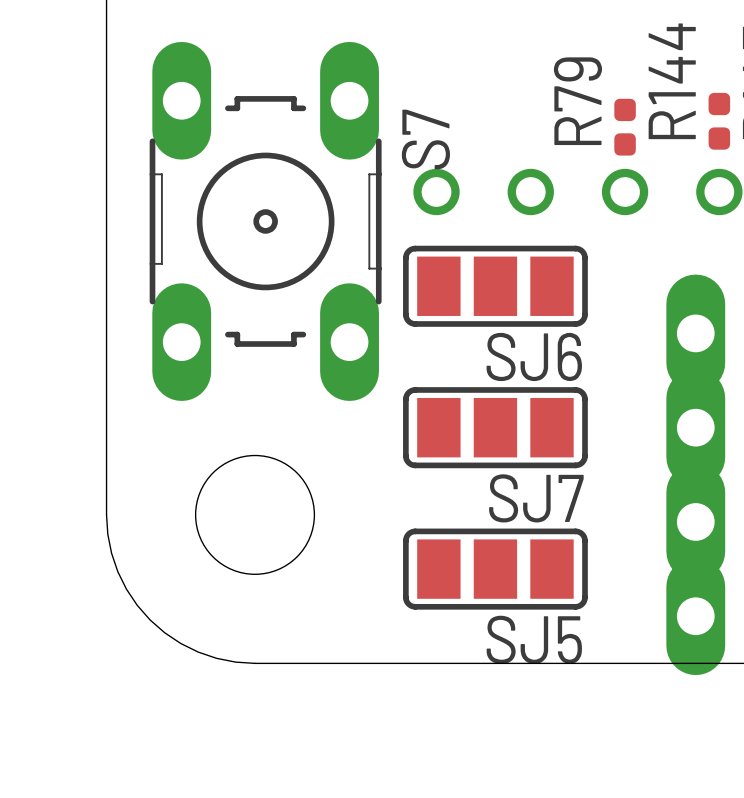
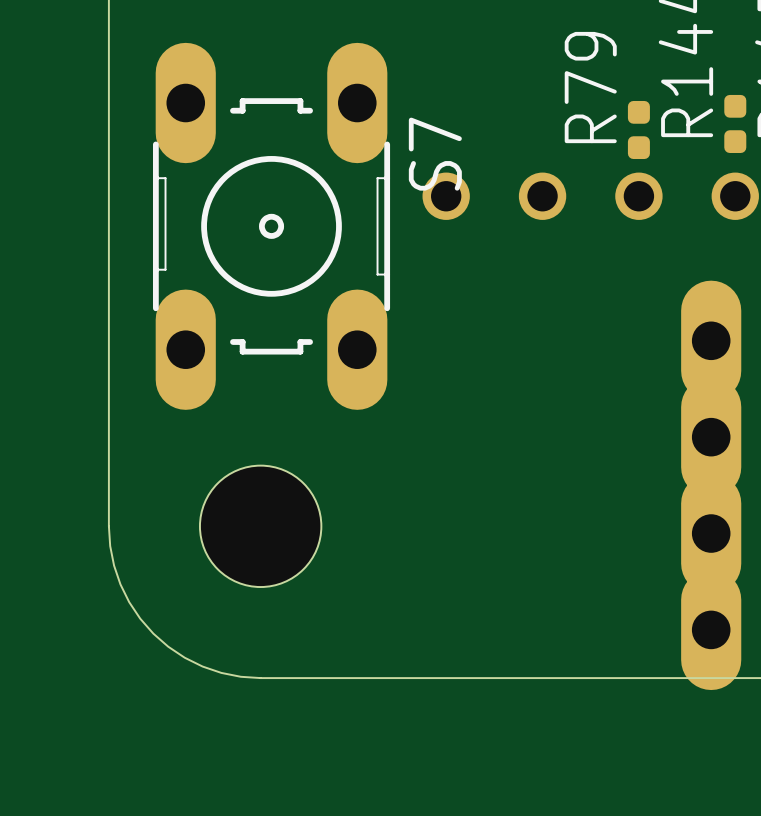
SJ6: (495, 286) -> none
SJ7: (495, 427) -> none
SJ5: (495, 569) -> none

